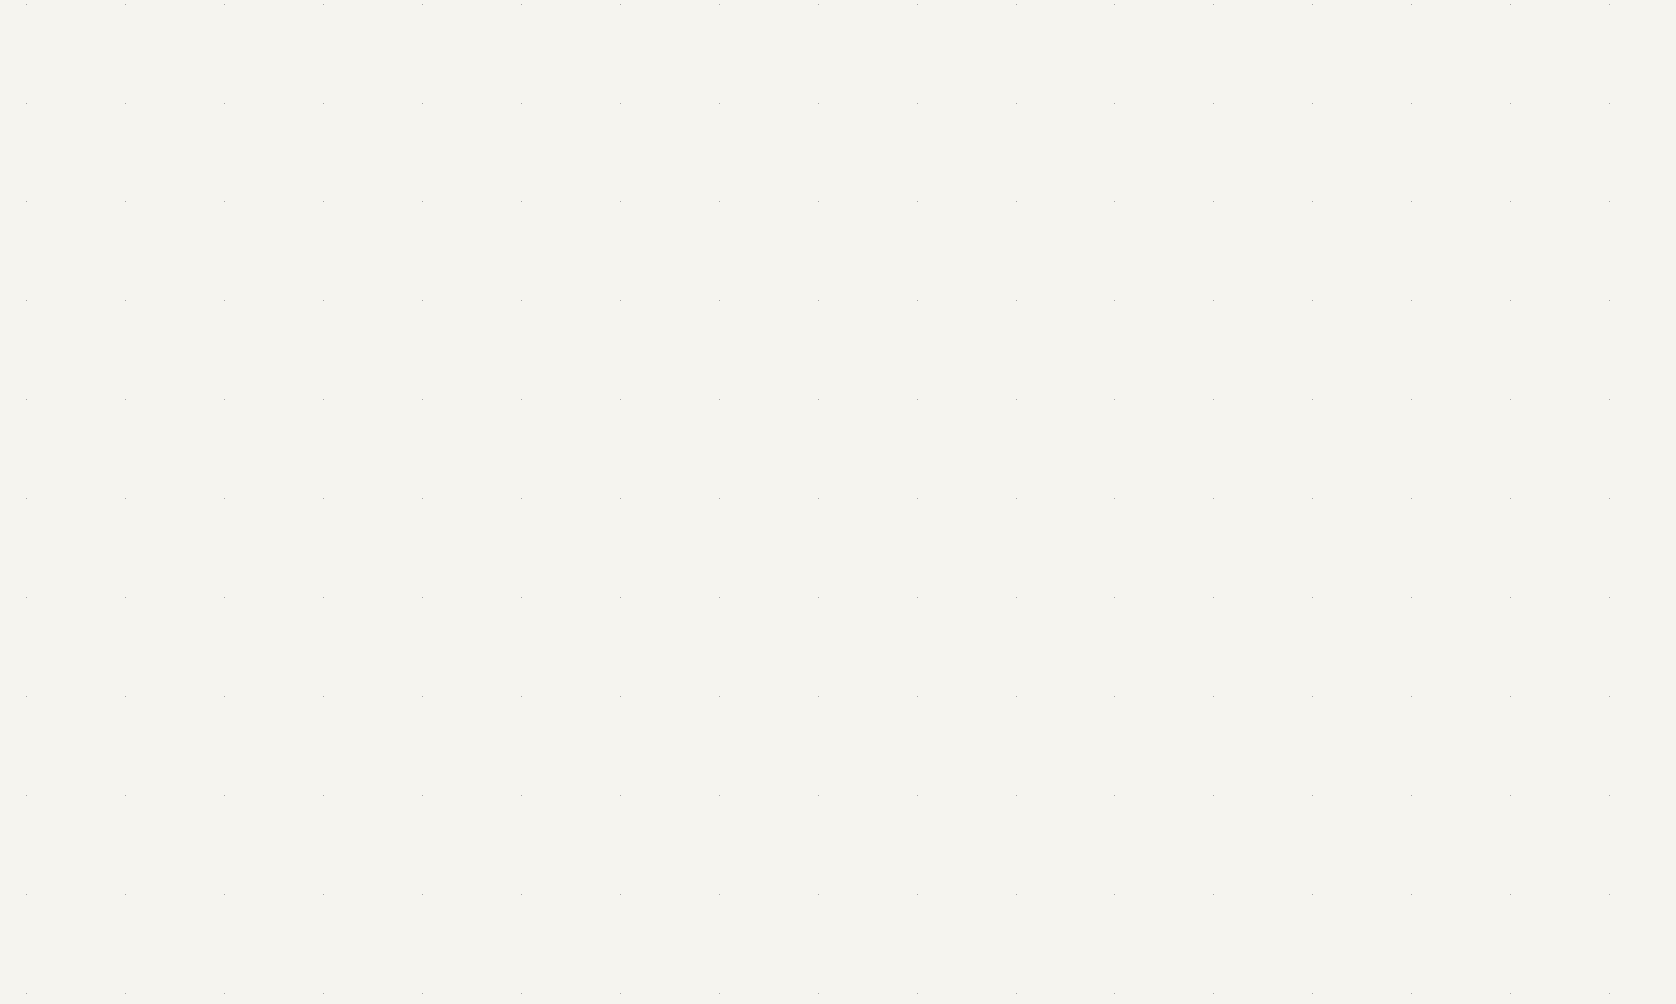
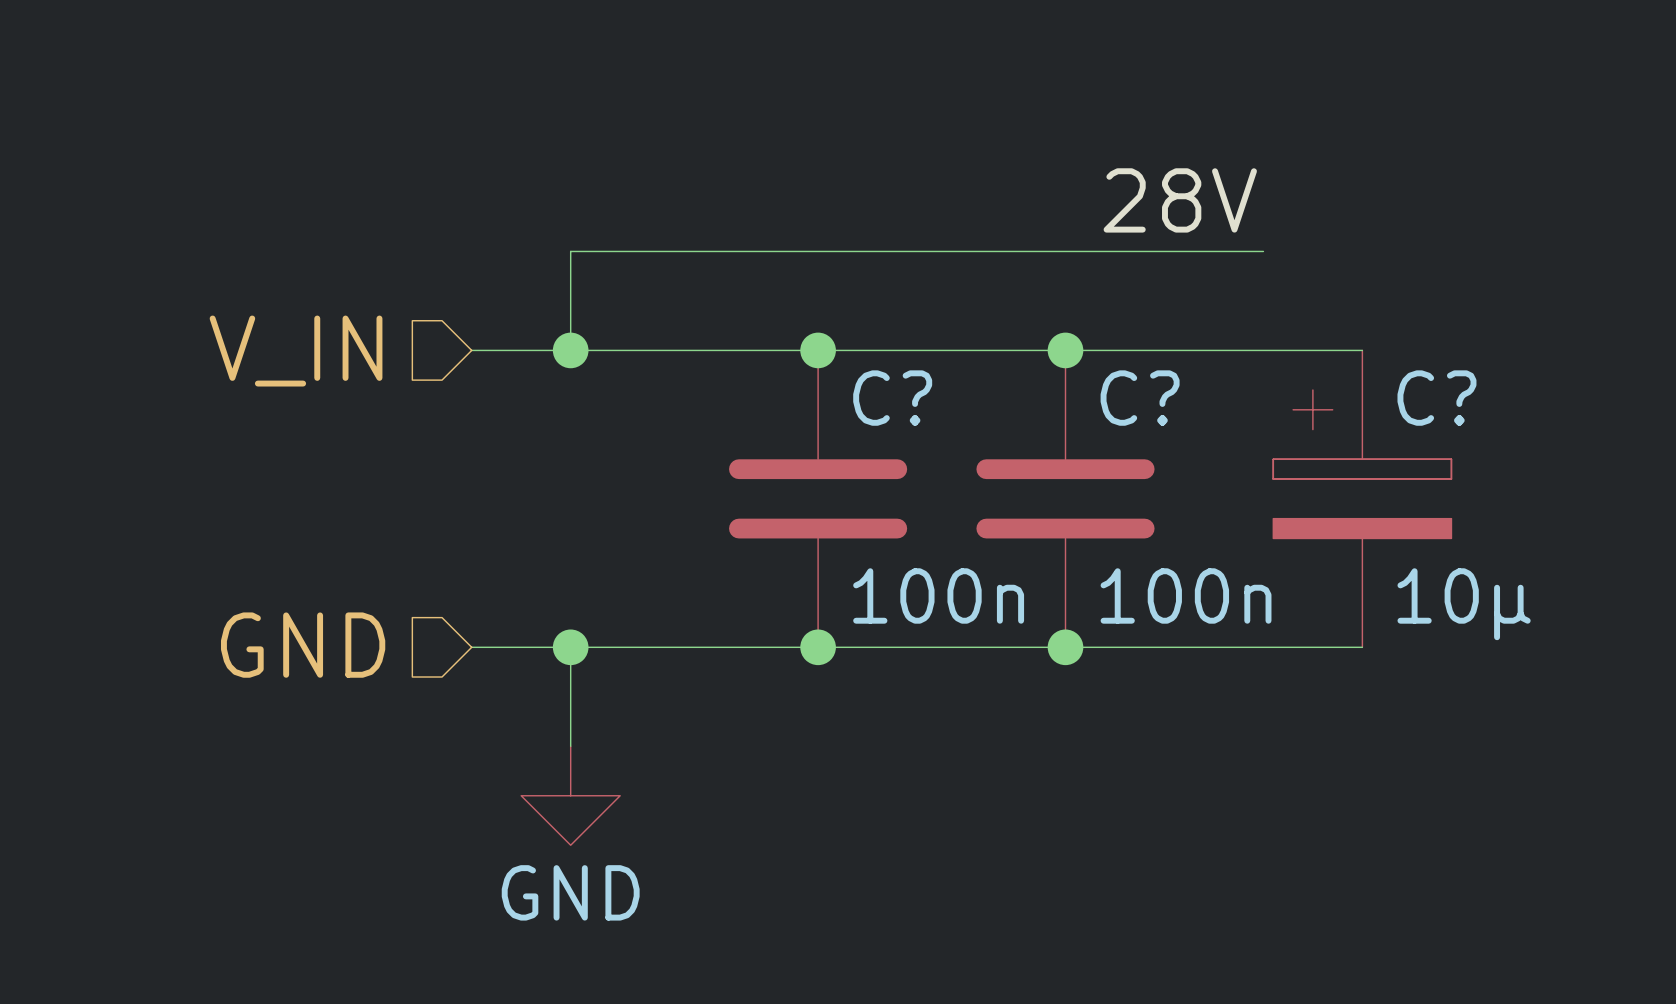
label: none -> 28V (1180, 200)
wire: none -> (1263, 251) (570, 251) (570, 350)
hierarchical label: none -> V_IN (296, 351)
wire: none -> (471, 350) (1362, 350)
junction: none -> (570, 350)
junction: none -> (818, 350)
junction: none -> (1065, 350)
C?: none -> 100n (818, 498)
C?: none -> 100n (1065, 498)
C?: none -> 10µ (1362, 498)
hierarchical label: none -> GND (303, 645)
wire: none -> (471, 647) (1362, 647)
wire: none -> (570, 647) (570, 746)
junction: none -> (570, 647)
junction: none -> (818, 647)
junction: none -> (1065, 647)
power symbol: none -> GND (570, 795)

